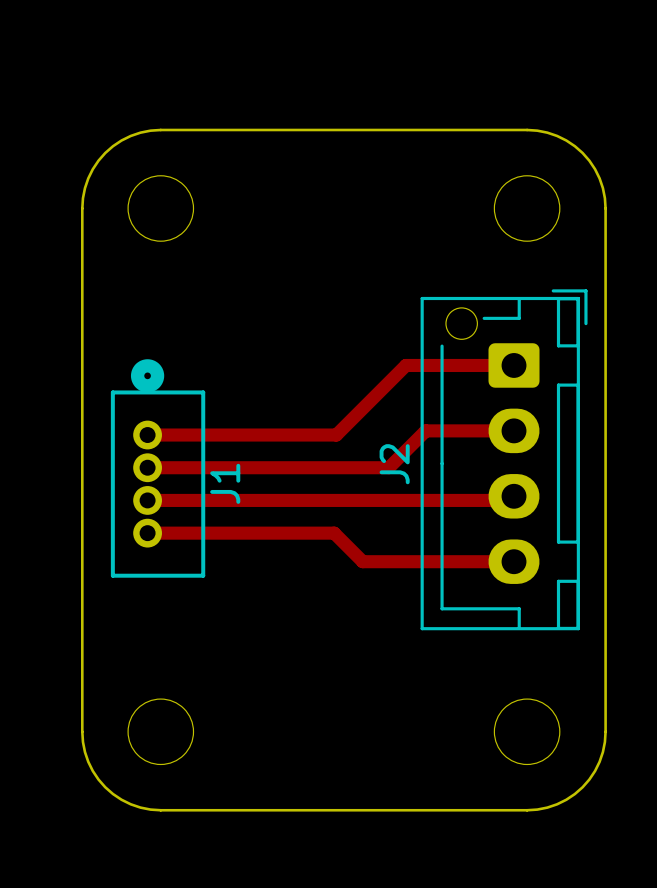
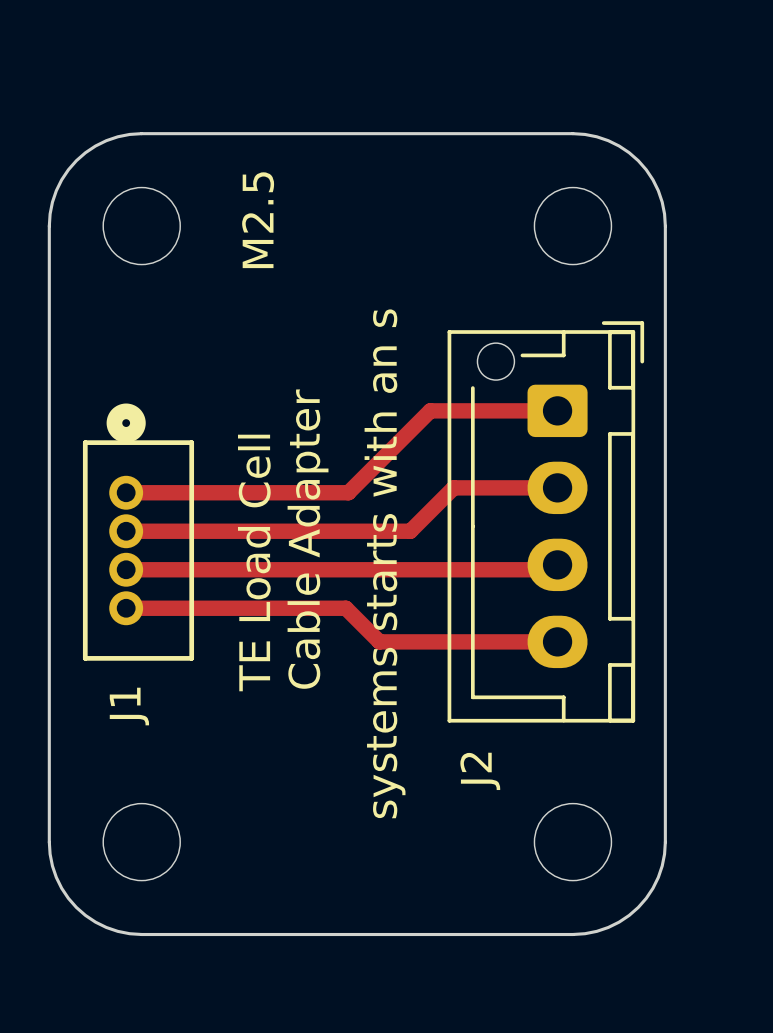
text: none -> M2.5 (258, 220)
text: none -> Cable Adapter (308, 539)
text: none -> systems starts with an s (385, 563)
J2 name position: J2 (394, 464) -> J2 (480, 771)
text: none -> TE Load Cell (254, 562)
J1 name position: J1 (225, 483) -> J1 (129, 706)

